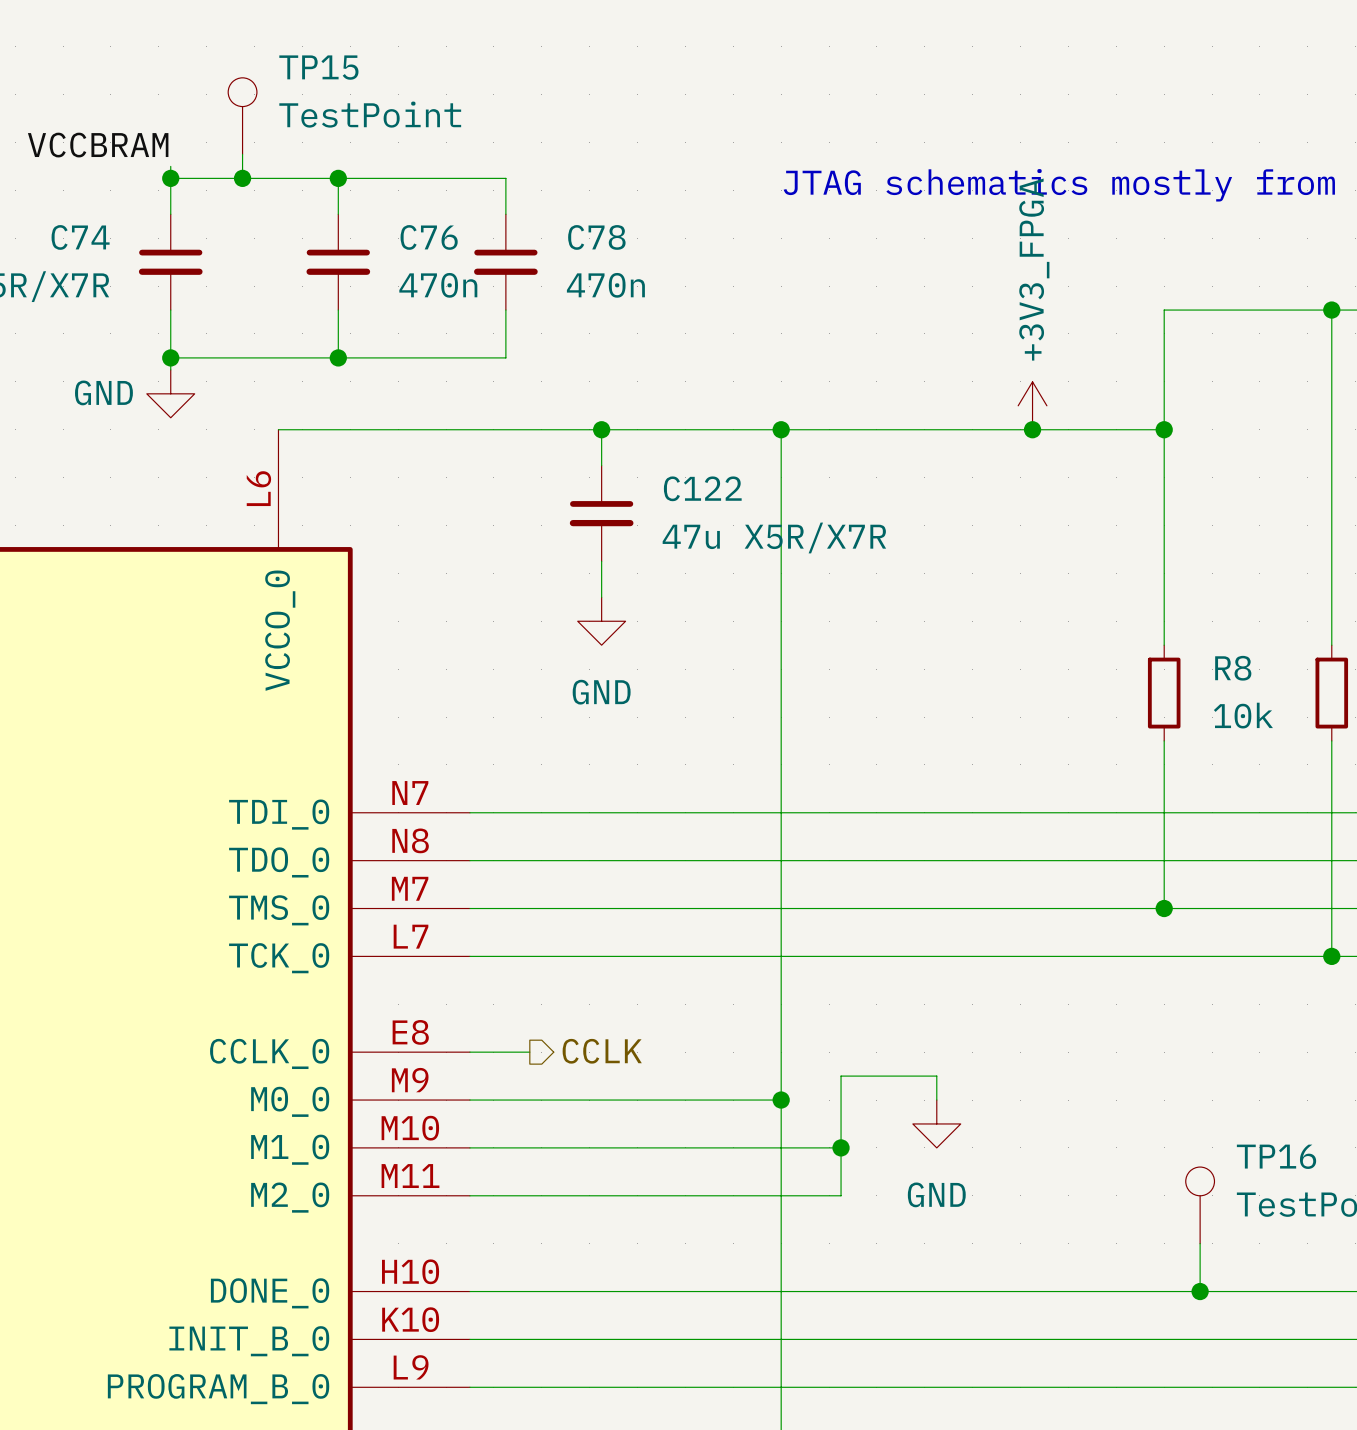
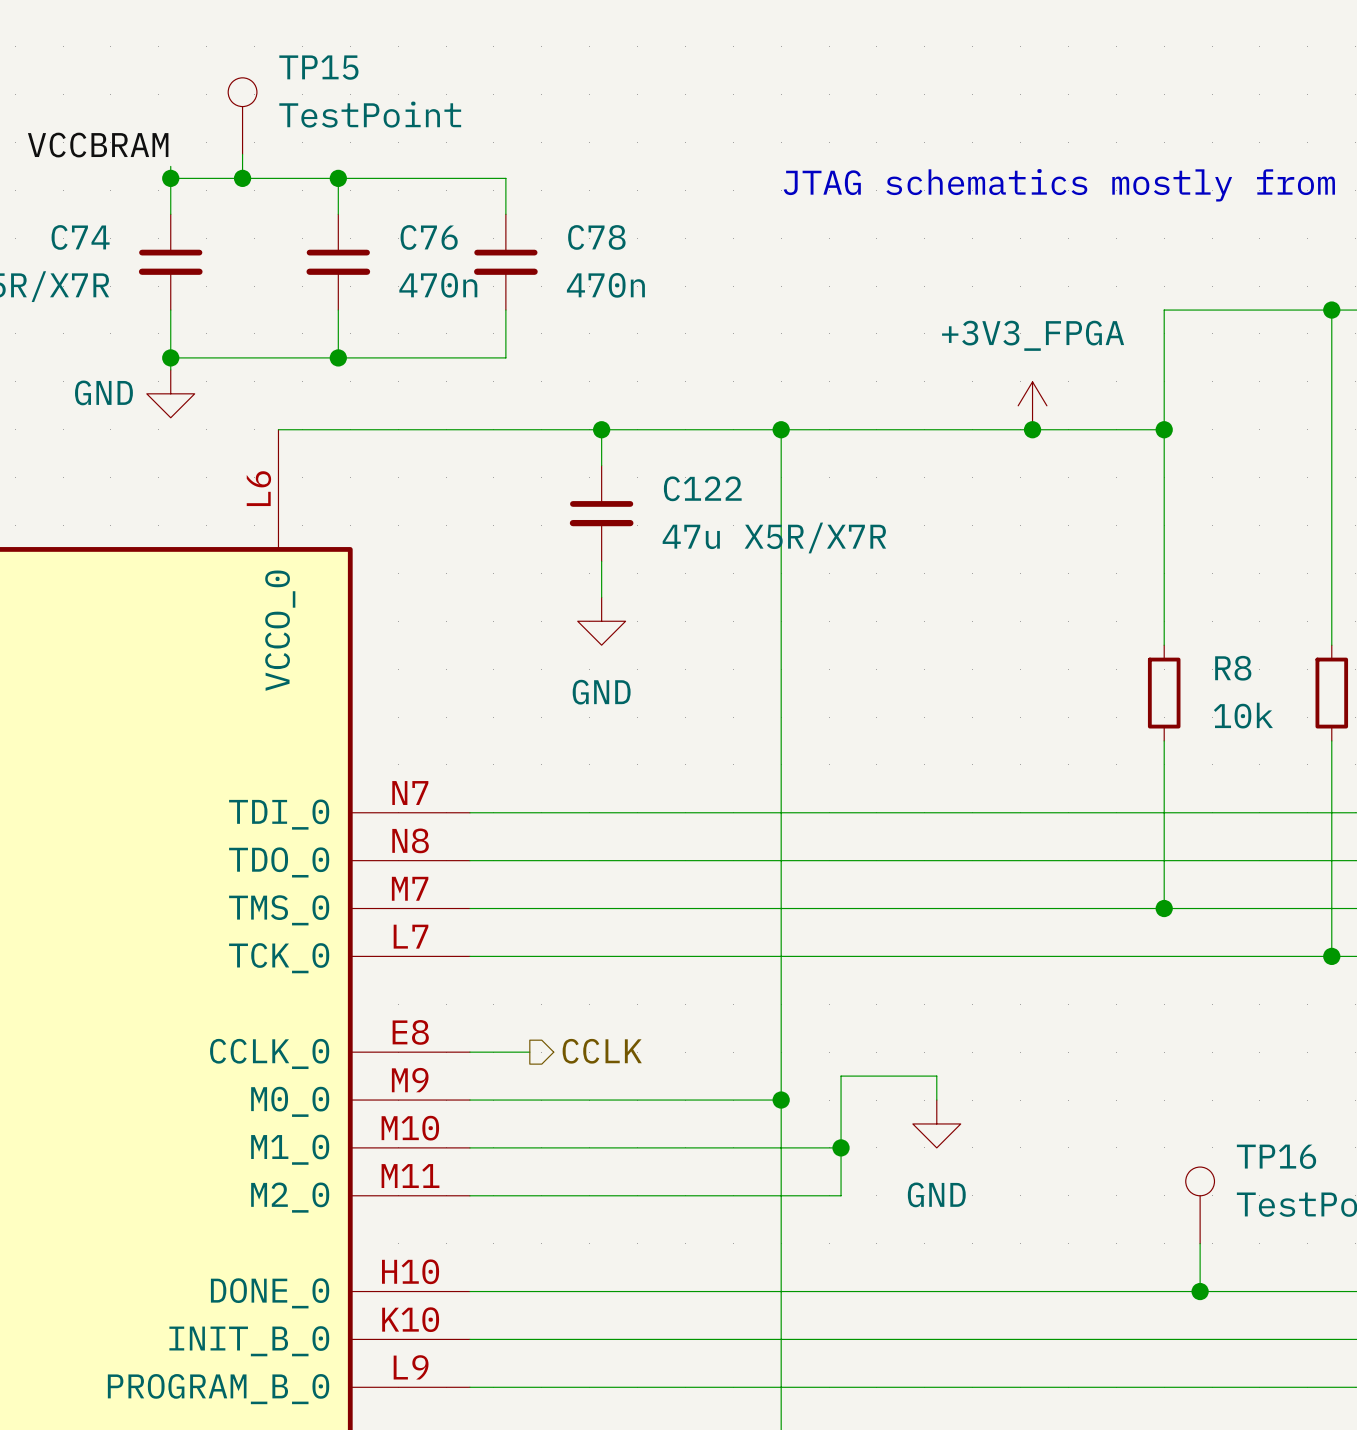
power symbol text rotation: 0° (1034, 269) -> 90° clockwise (1033, 335)

